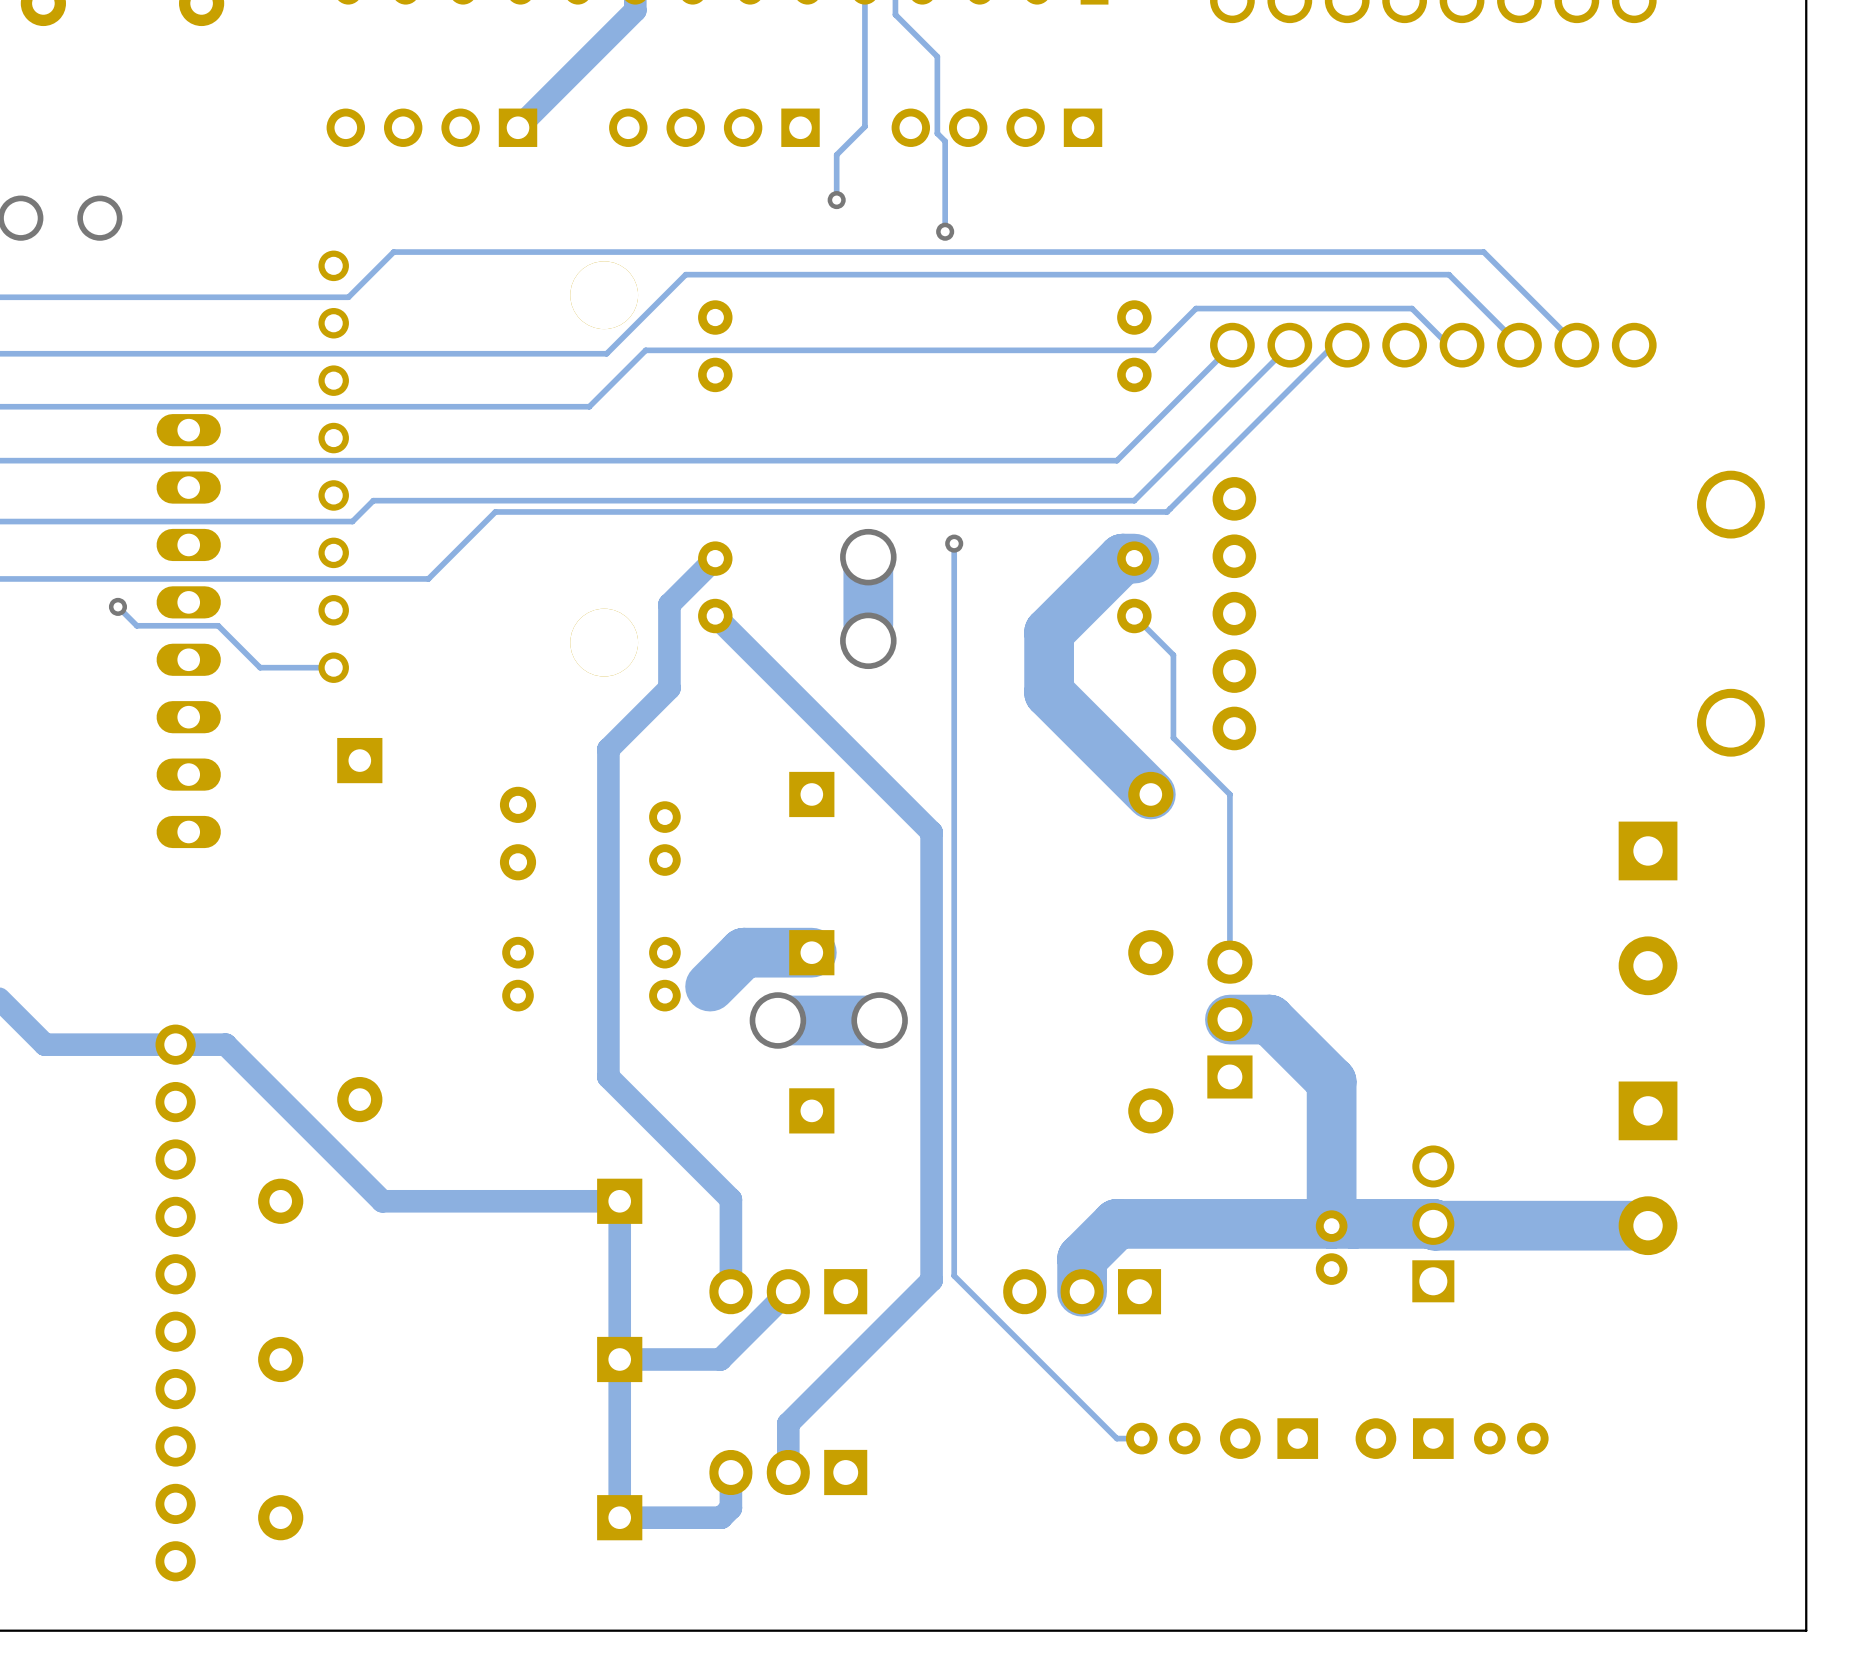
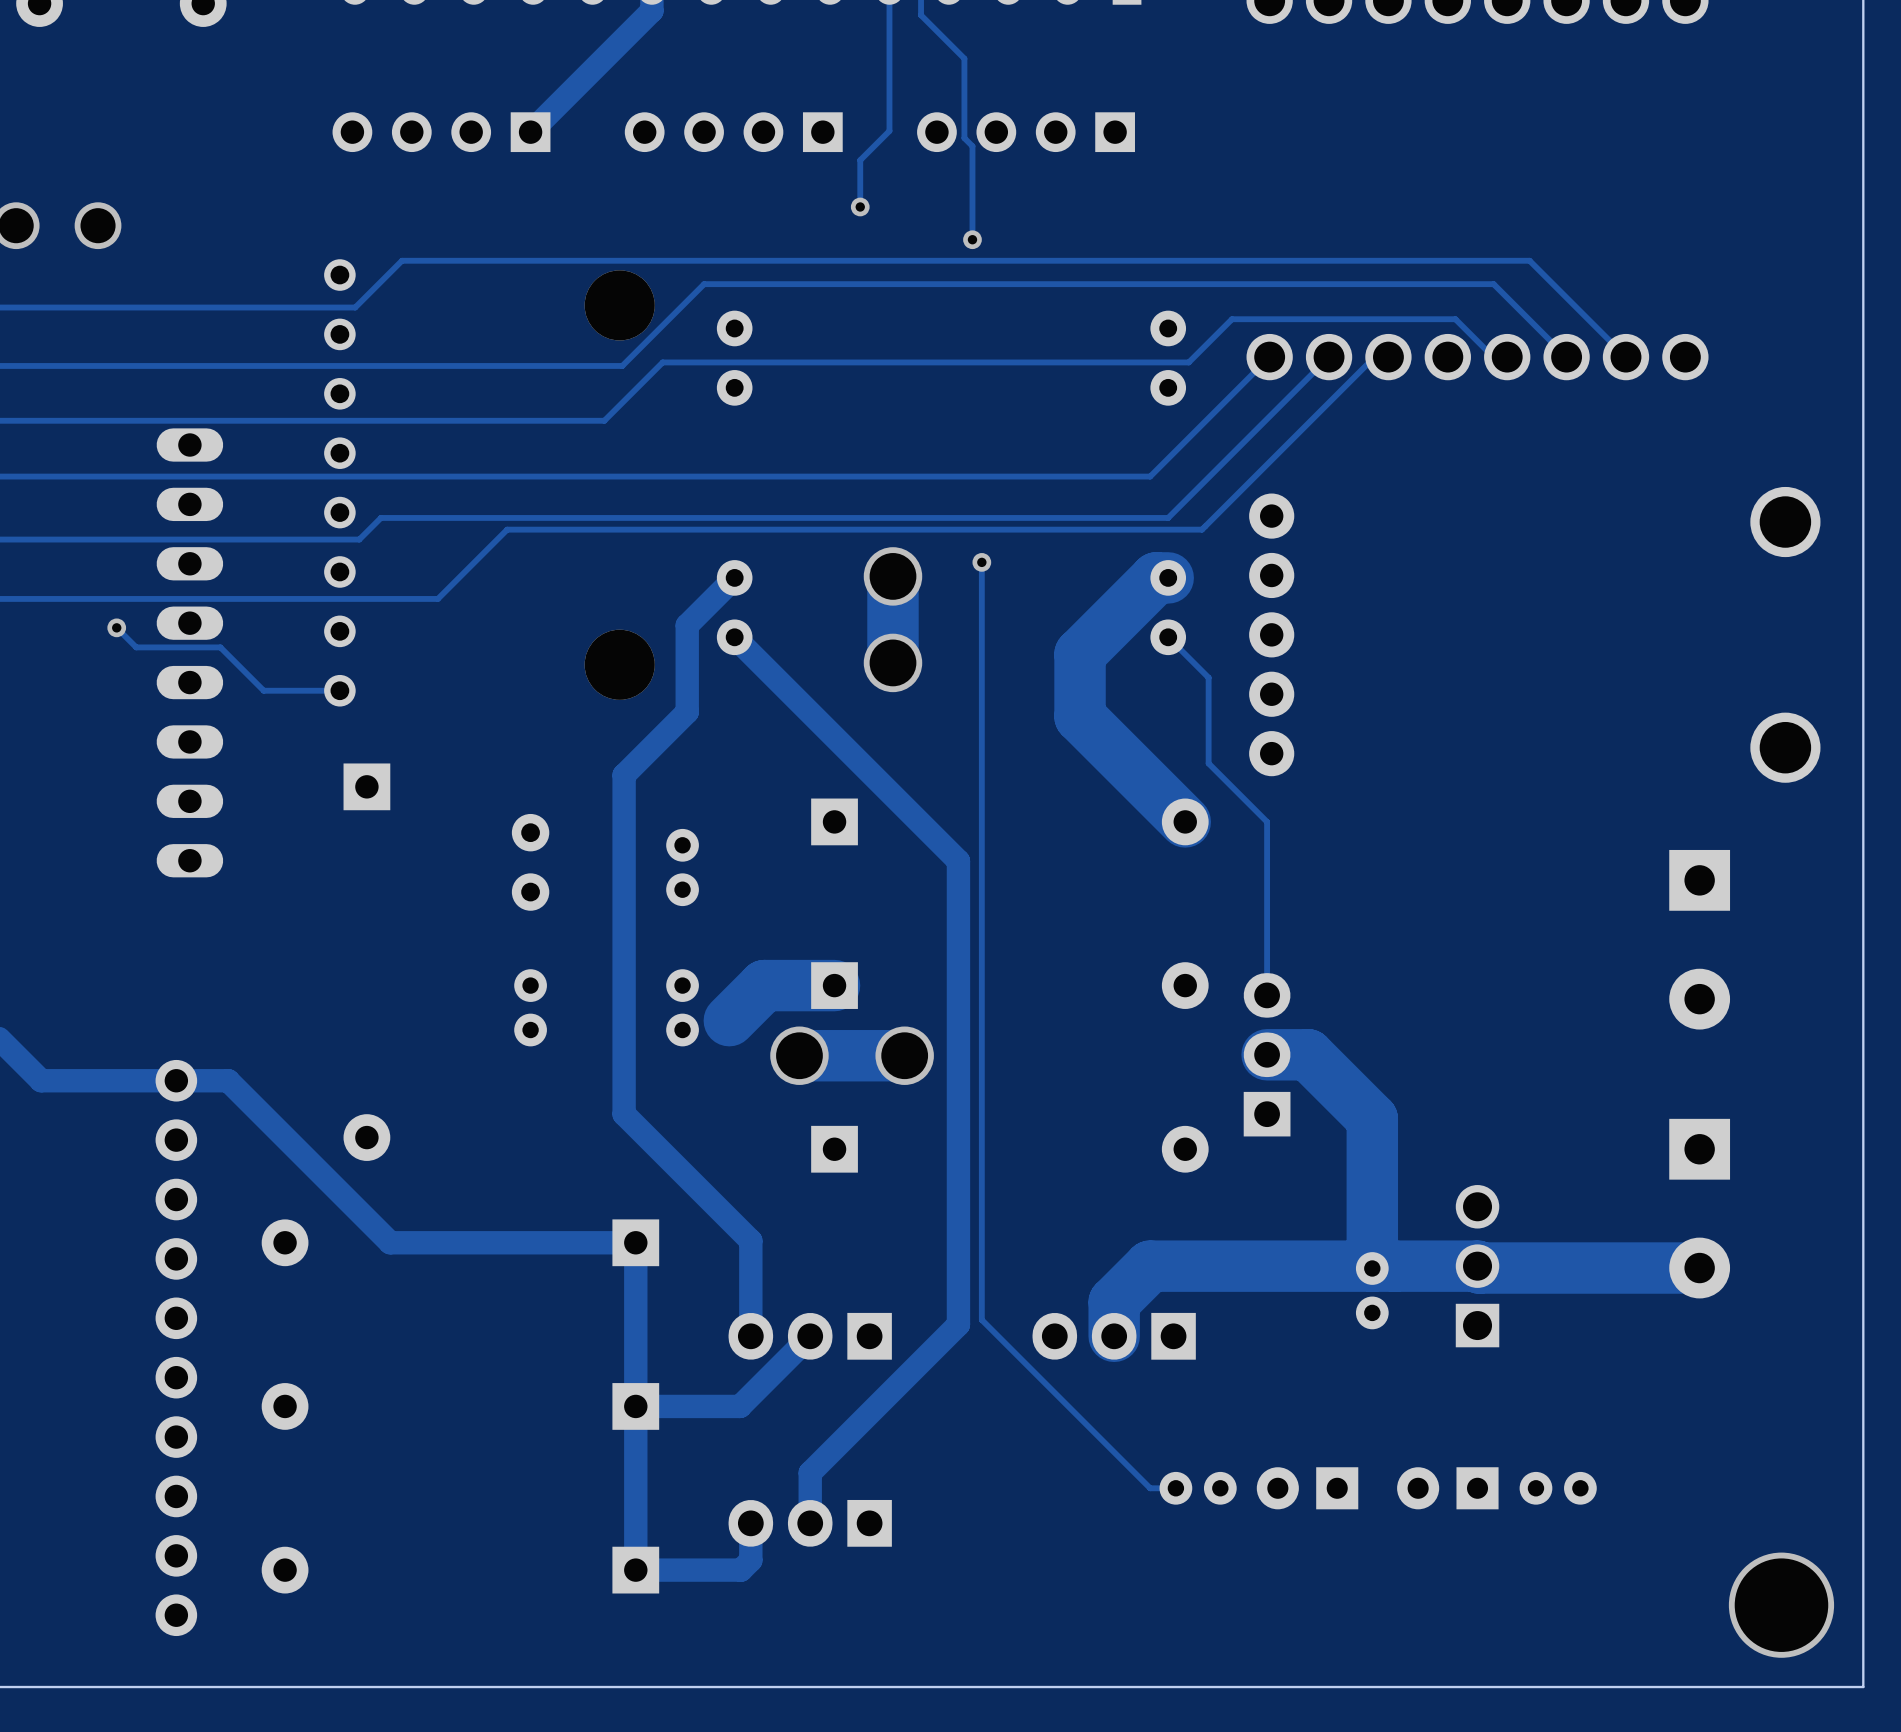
via: none -> (1781, 1605)

